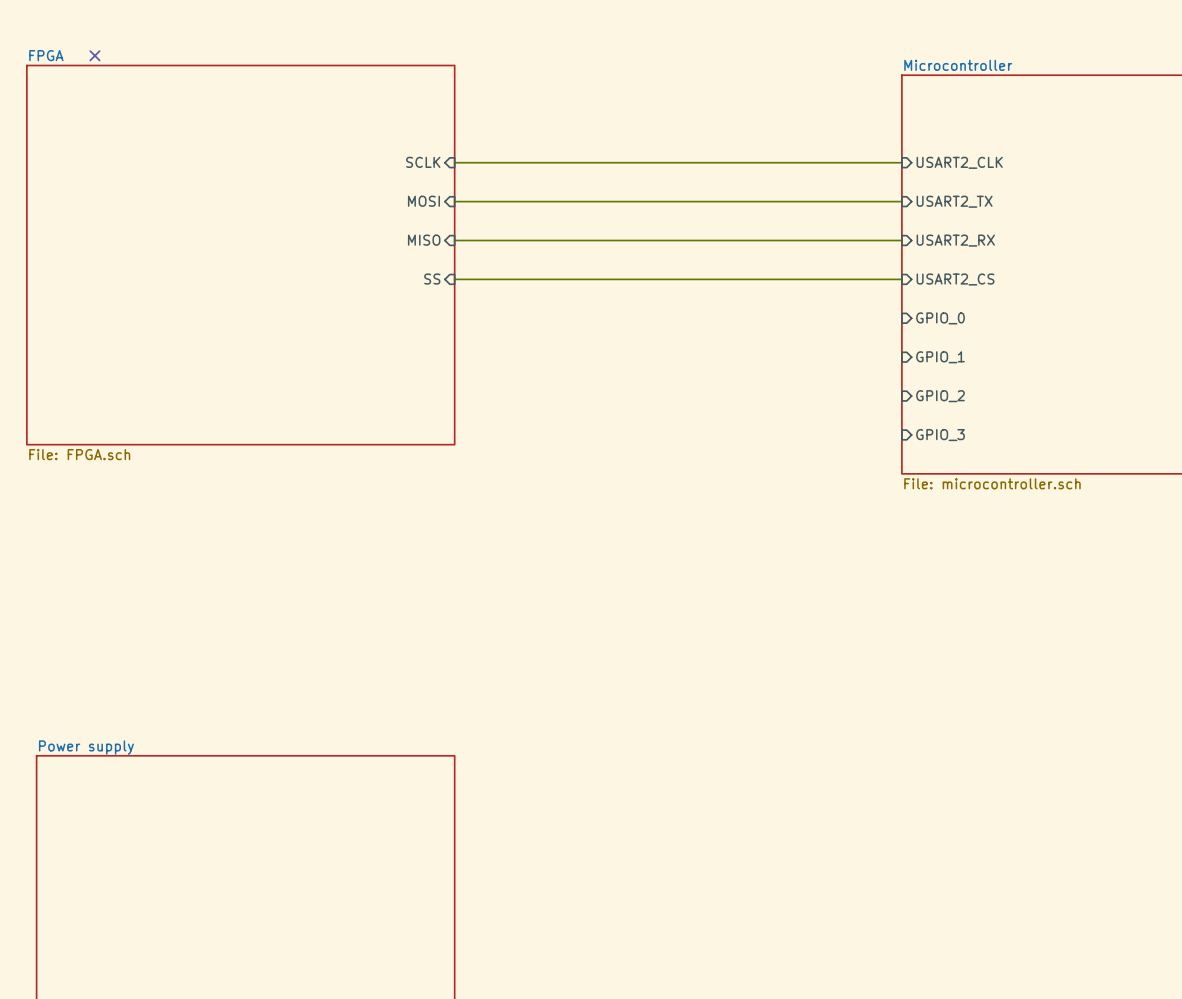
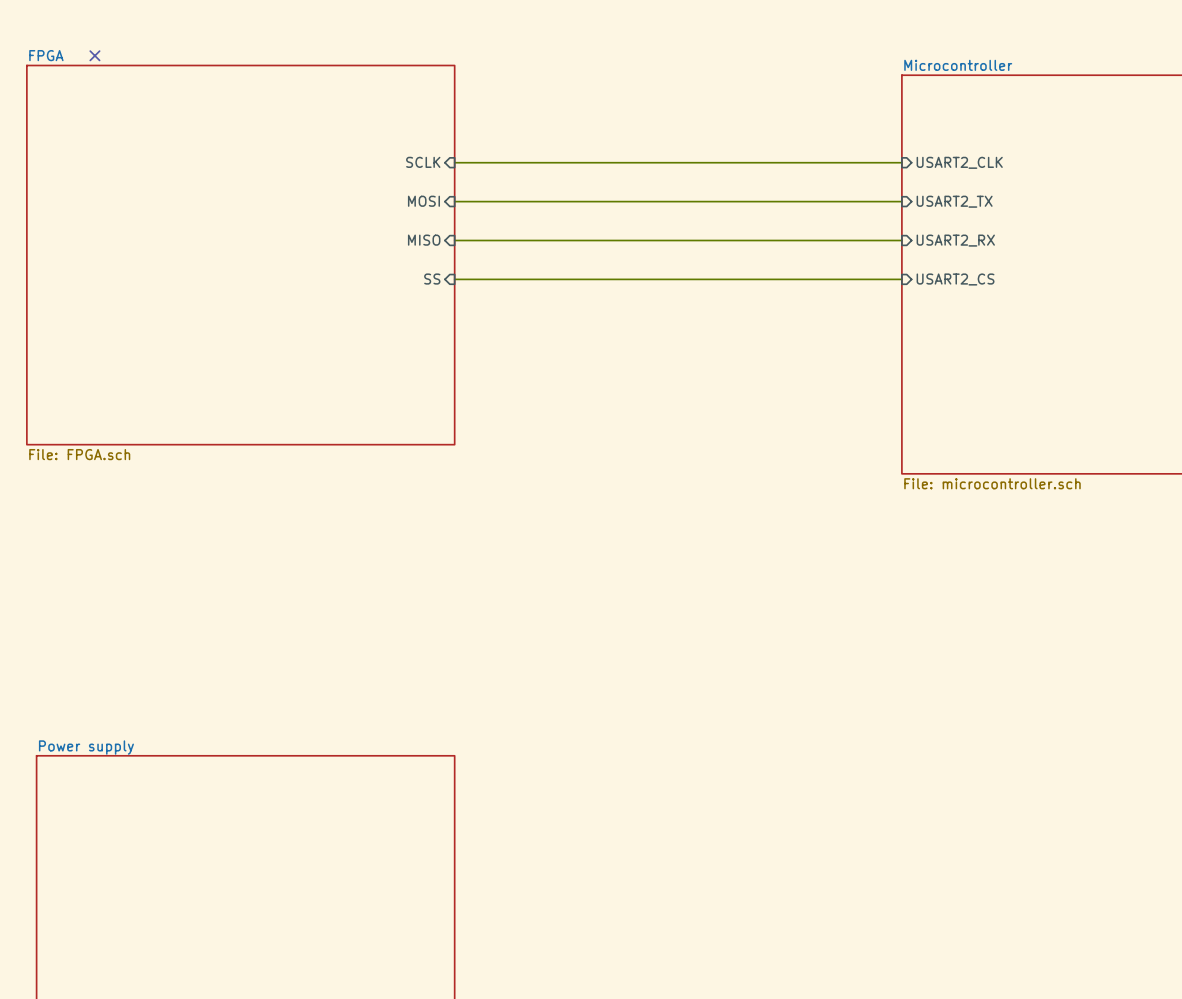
sheet pin: GPIO_0 (940, 318) -> none
sheet pin: GPIO_1 (940, 357) -> none
sheet pin: GPIO_2 (940, 396) -> none
sheet pin: GPIO_3 (940, 435) -> none

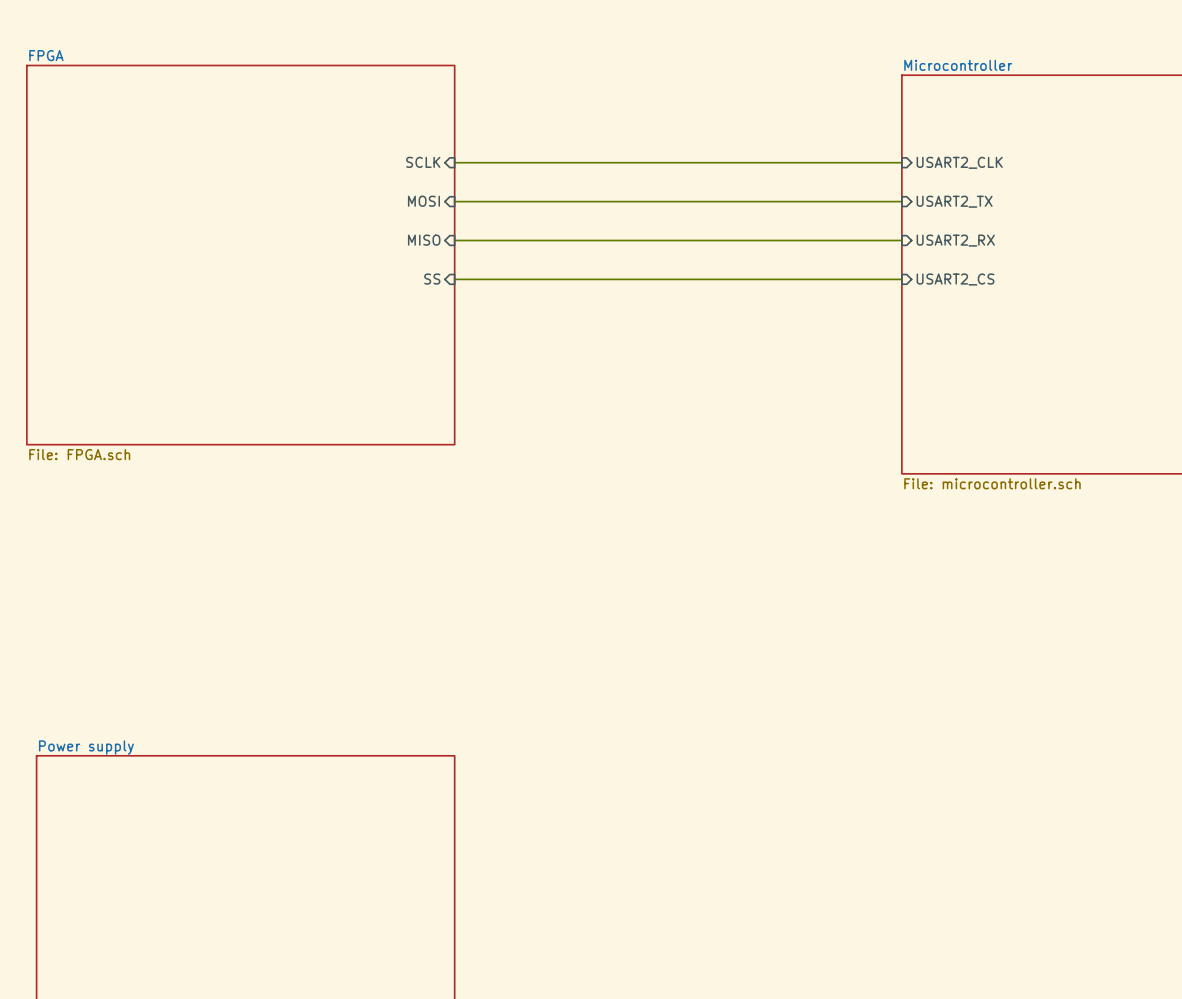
no-connect mark: (94, 55) -> none

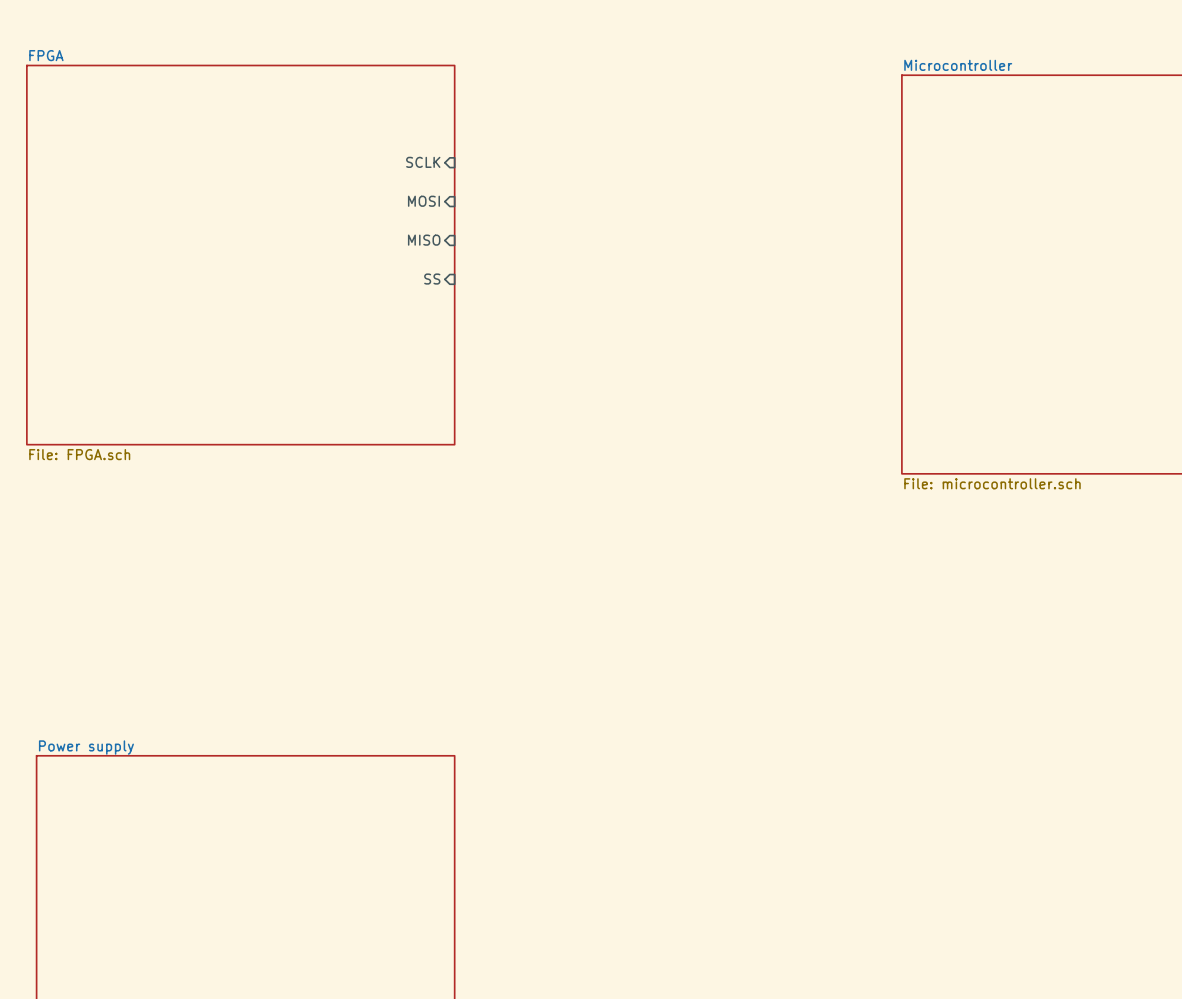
wire: (454, 162) (901, 162) -> none
sheet pin: USART2_CLK (959, 162) -> none
wire: (454, 201) (901, 201) -> none
sheet pin: USART2_TX (954, 201) -> none
wire: (454, 240) (901, 240) -> none
sheet pin: USART2_RX (955, 240) -> none
wire: (454, 279) (901, 279) -> none
sheet pin: USART2_CS (955, 279) -> none

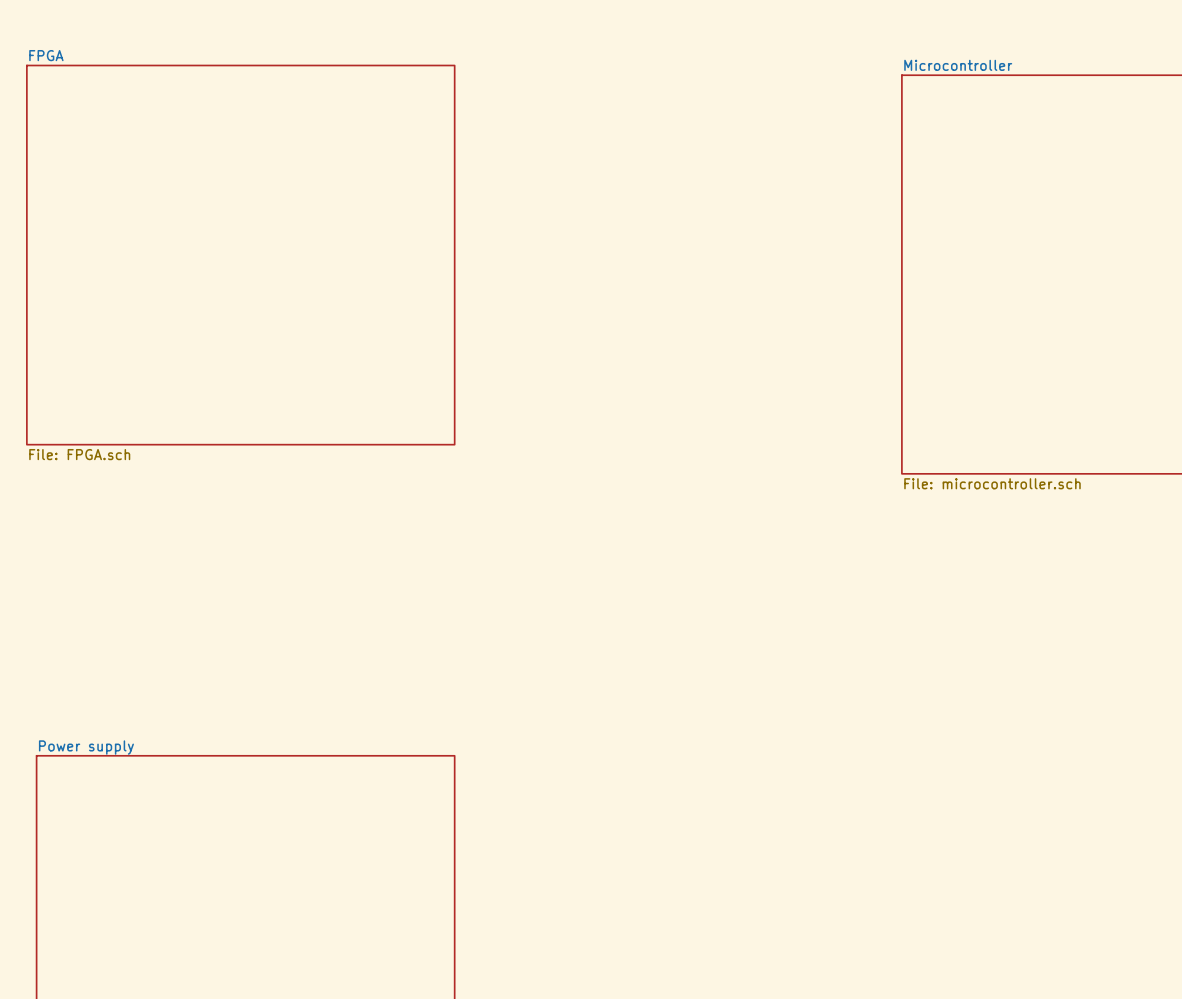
sheet pin: SCLK (423, 162) -> none
sheet pin: MOSI (423, 201) -> none
sheet pin: MISO (424, 240) -> none
sheet pin: SS (432, 279) -> none

